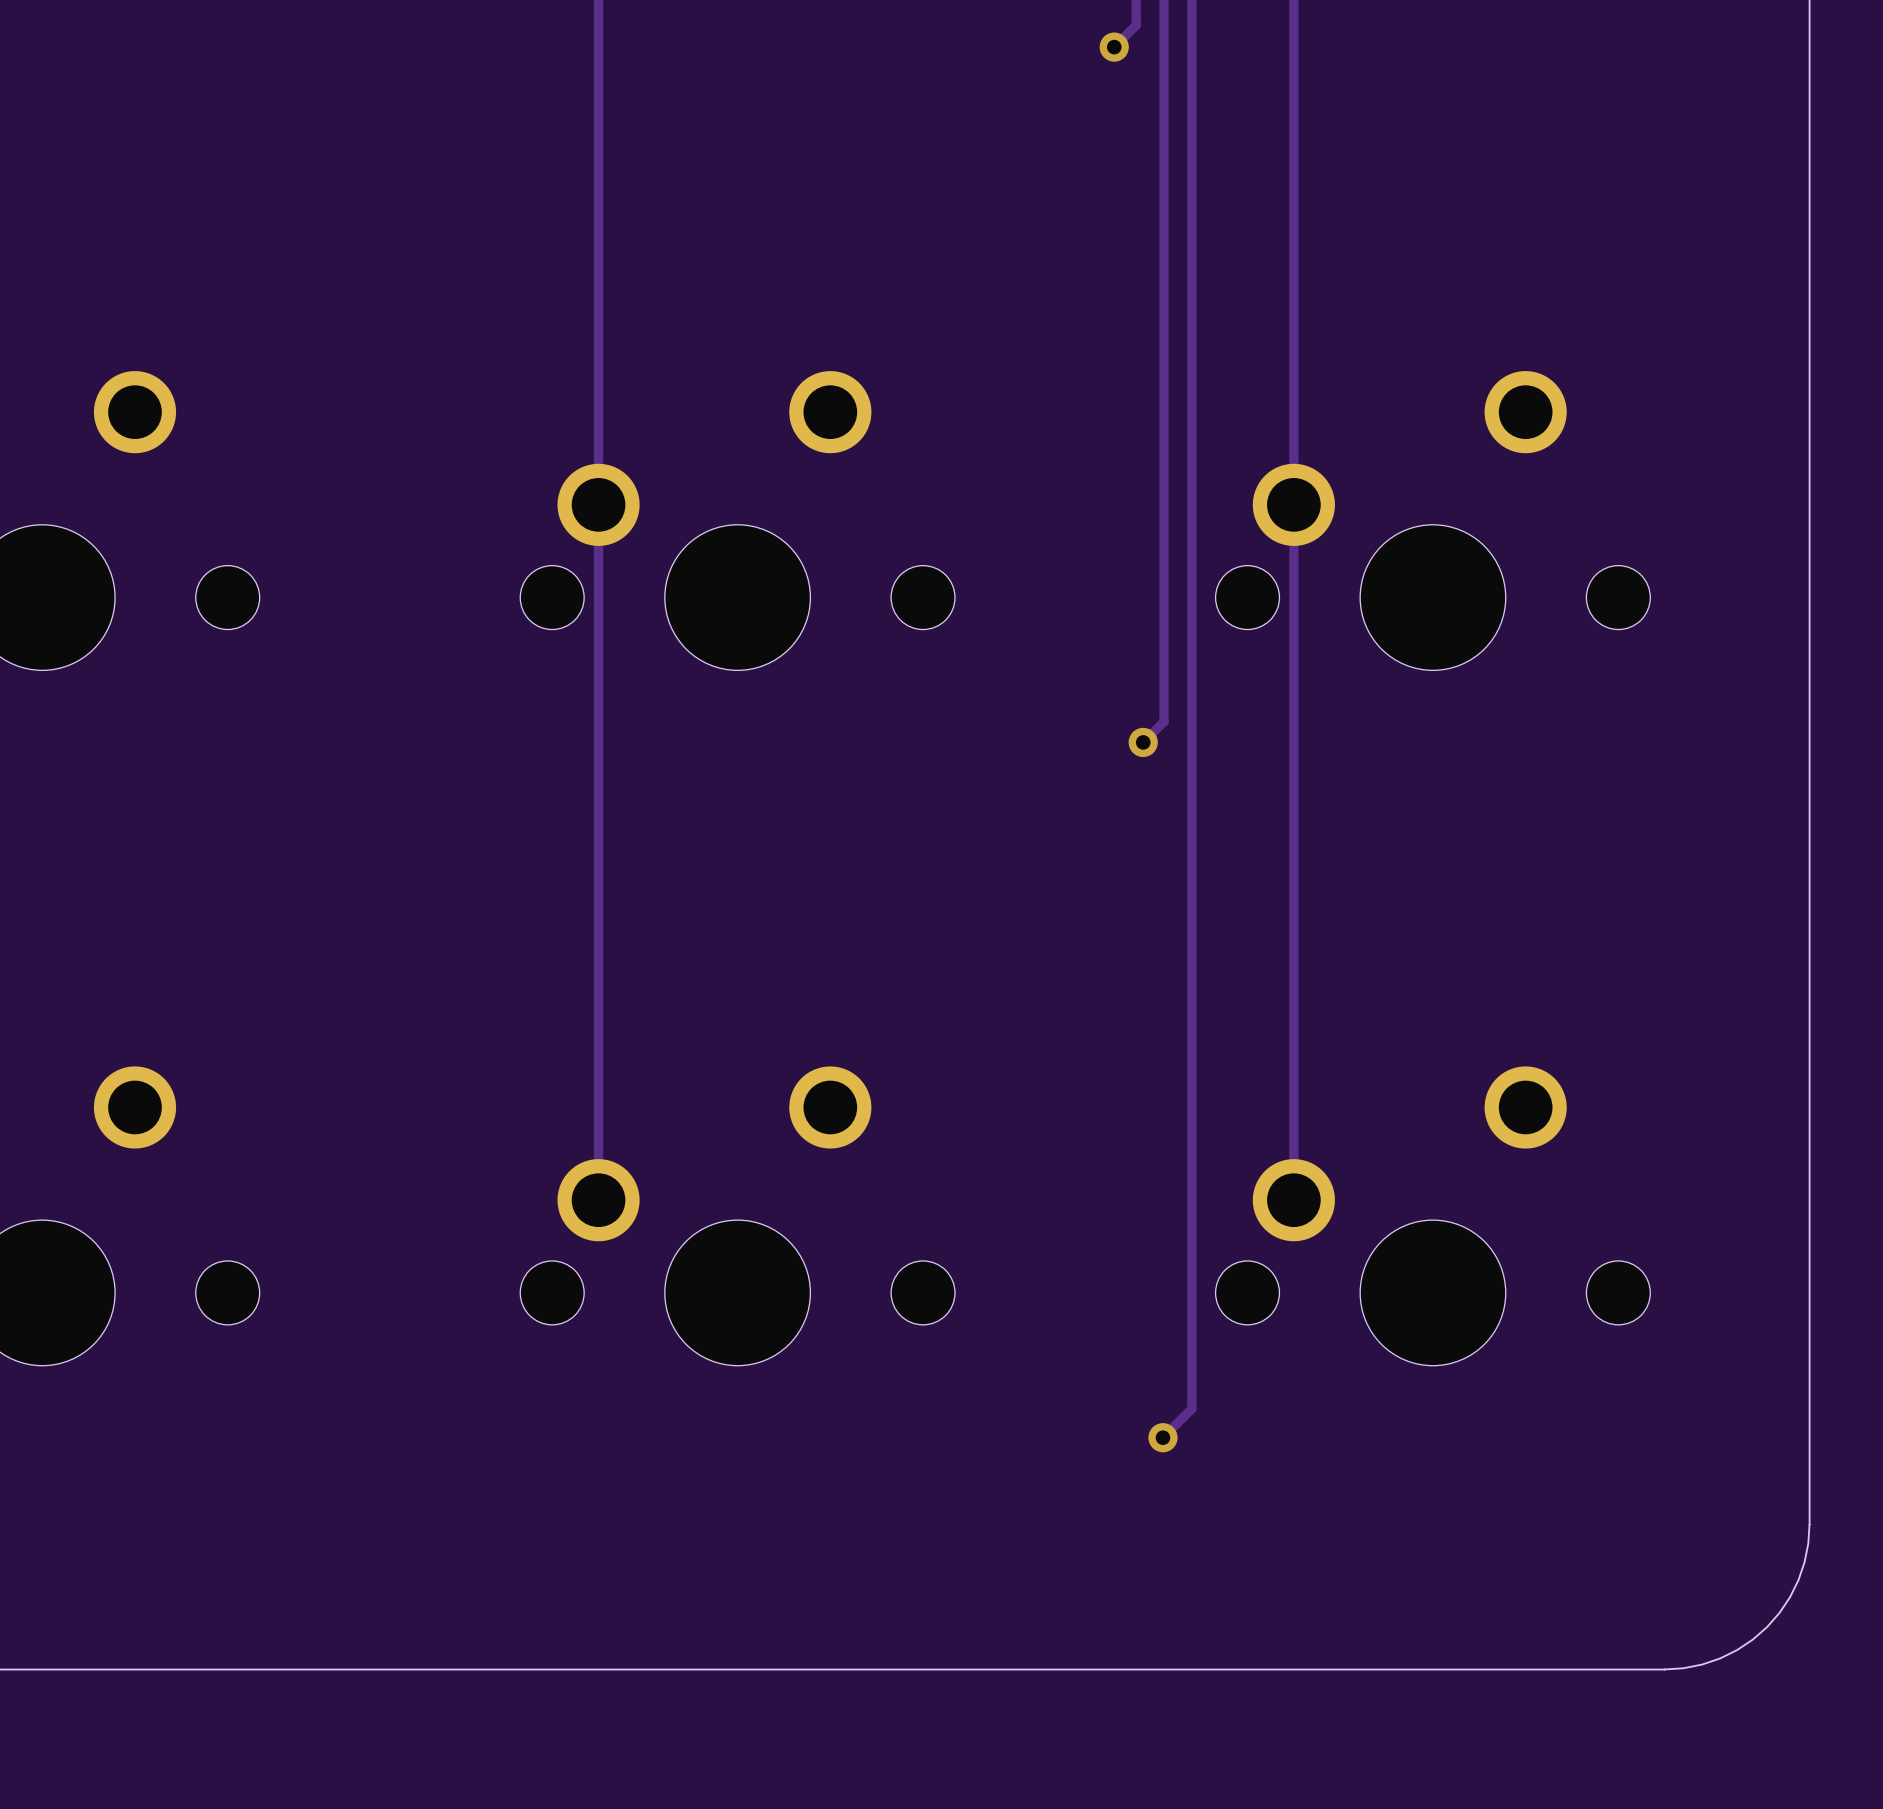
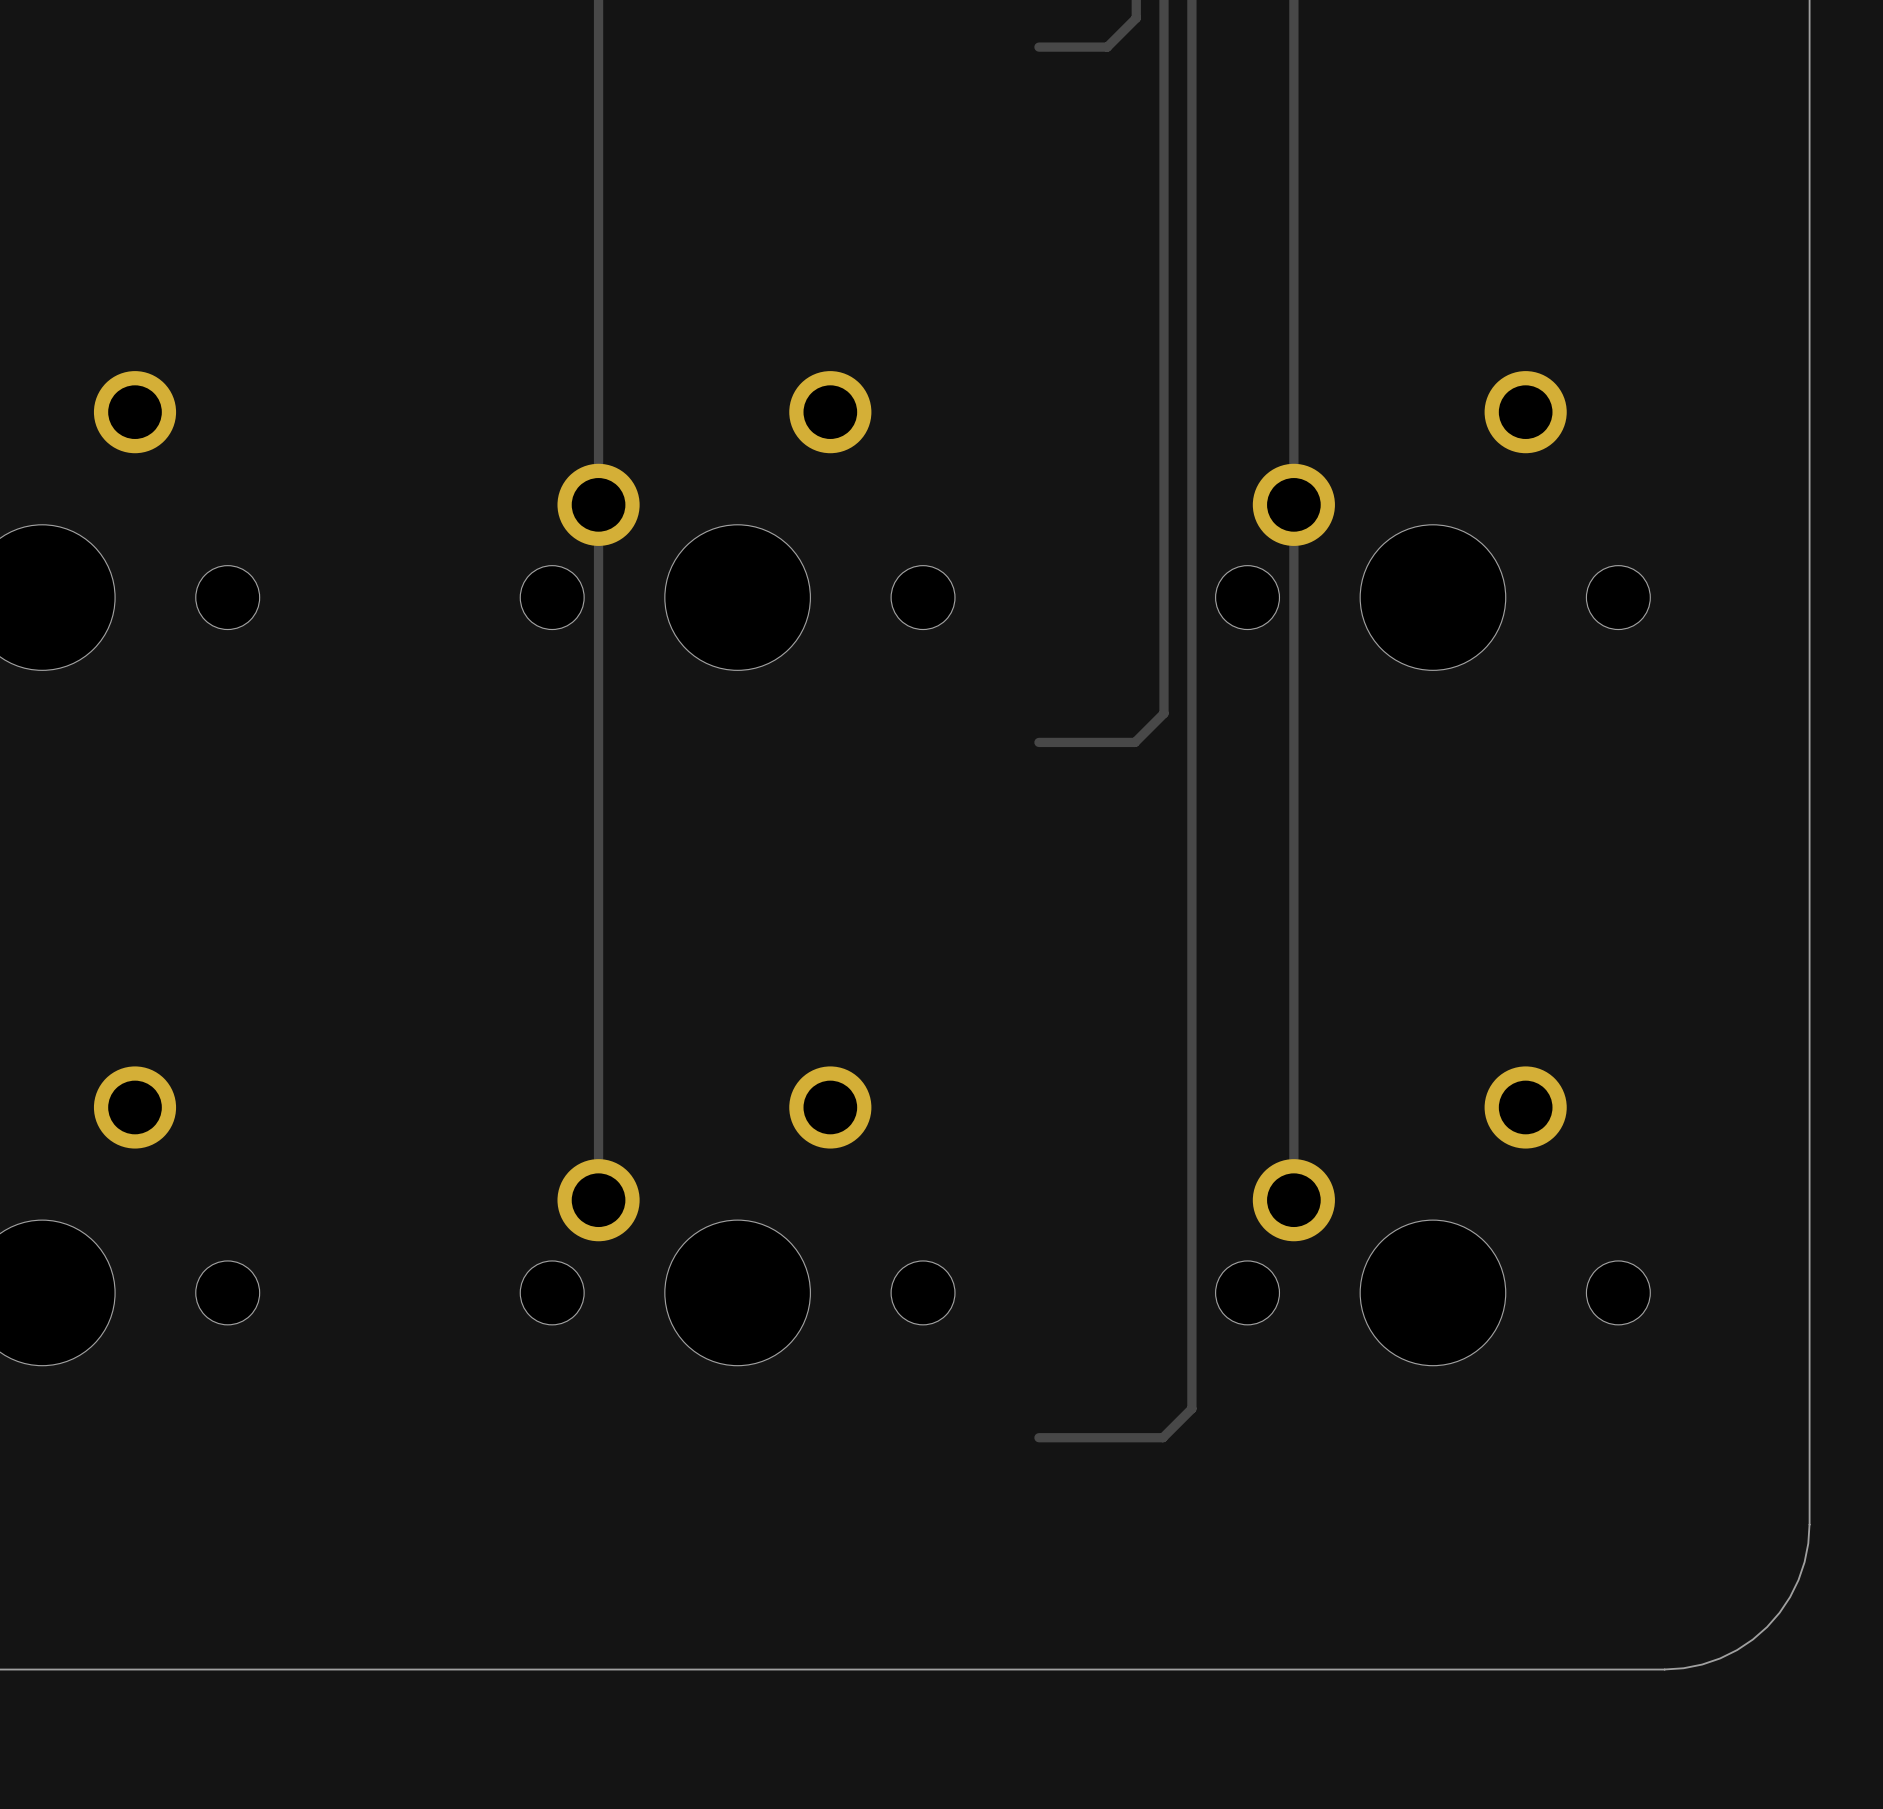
track: (1136, 18) (1136, 25) (1114, 47) -> (1136, 18) (1107, 47) (1038, 47)
via: (1114, 47) -> none
track: (1163, 713) (1163, 721) (1143, 742) -> (1163, 713) (1135, 742) (1038, 742)
via: (1143, 742) -> none
track: none -> (1038, 1437) (1162, 1437)
via: (1162, 1437) -> none

